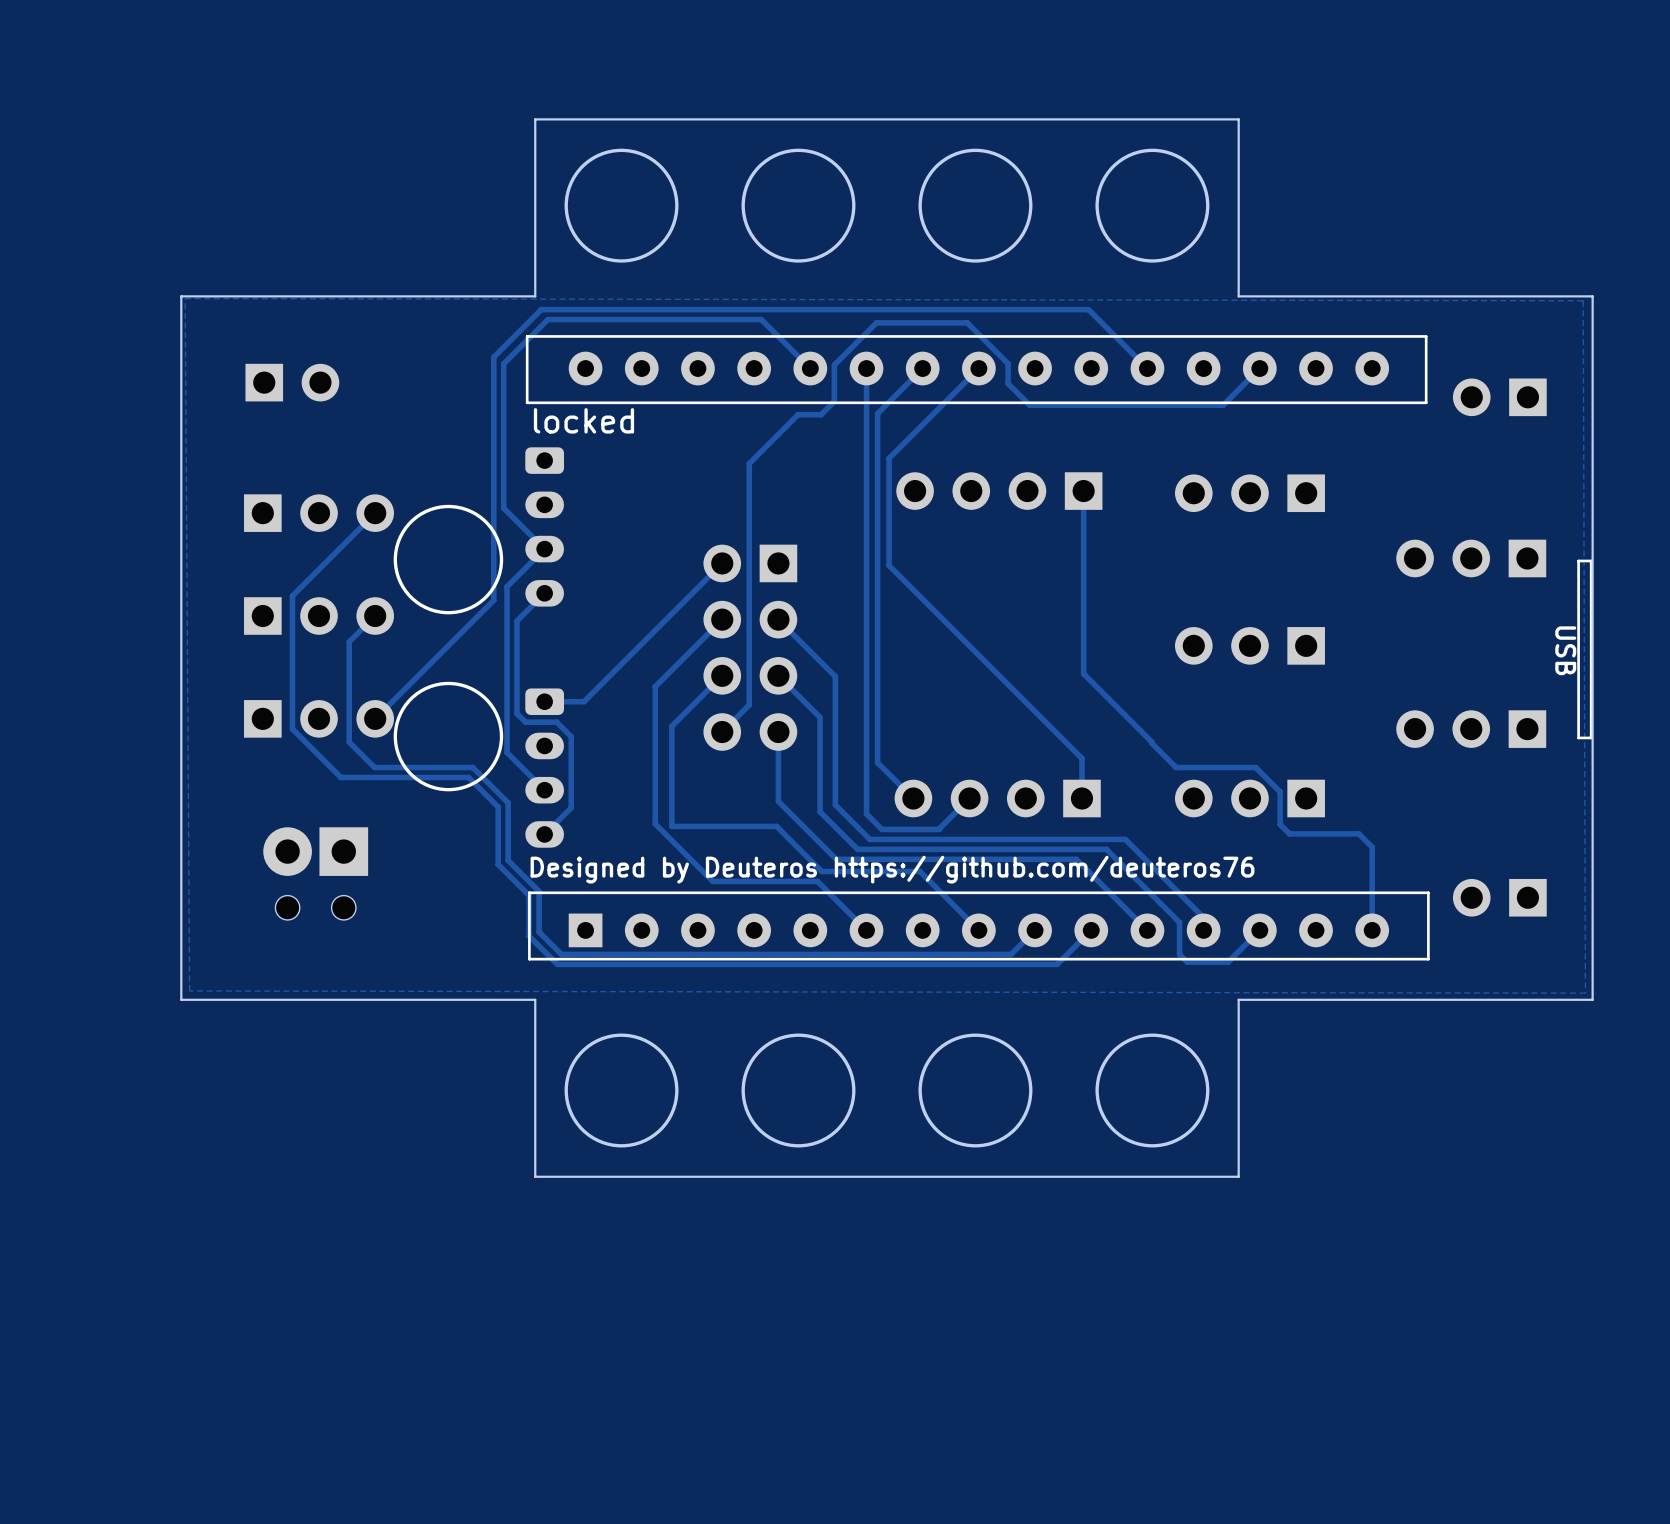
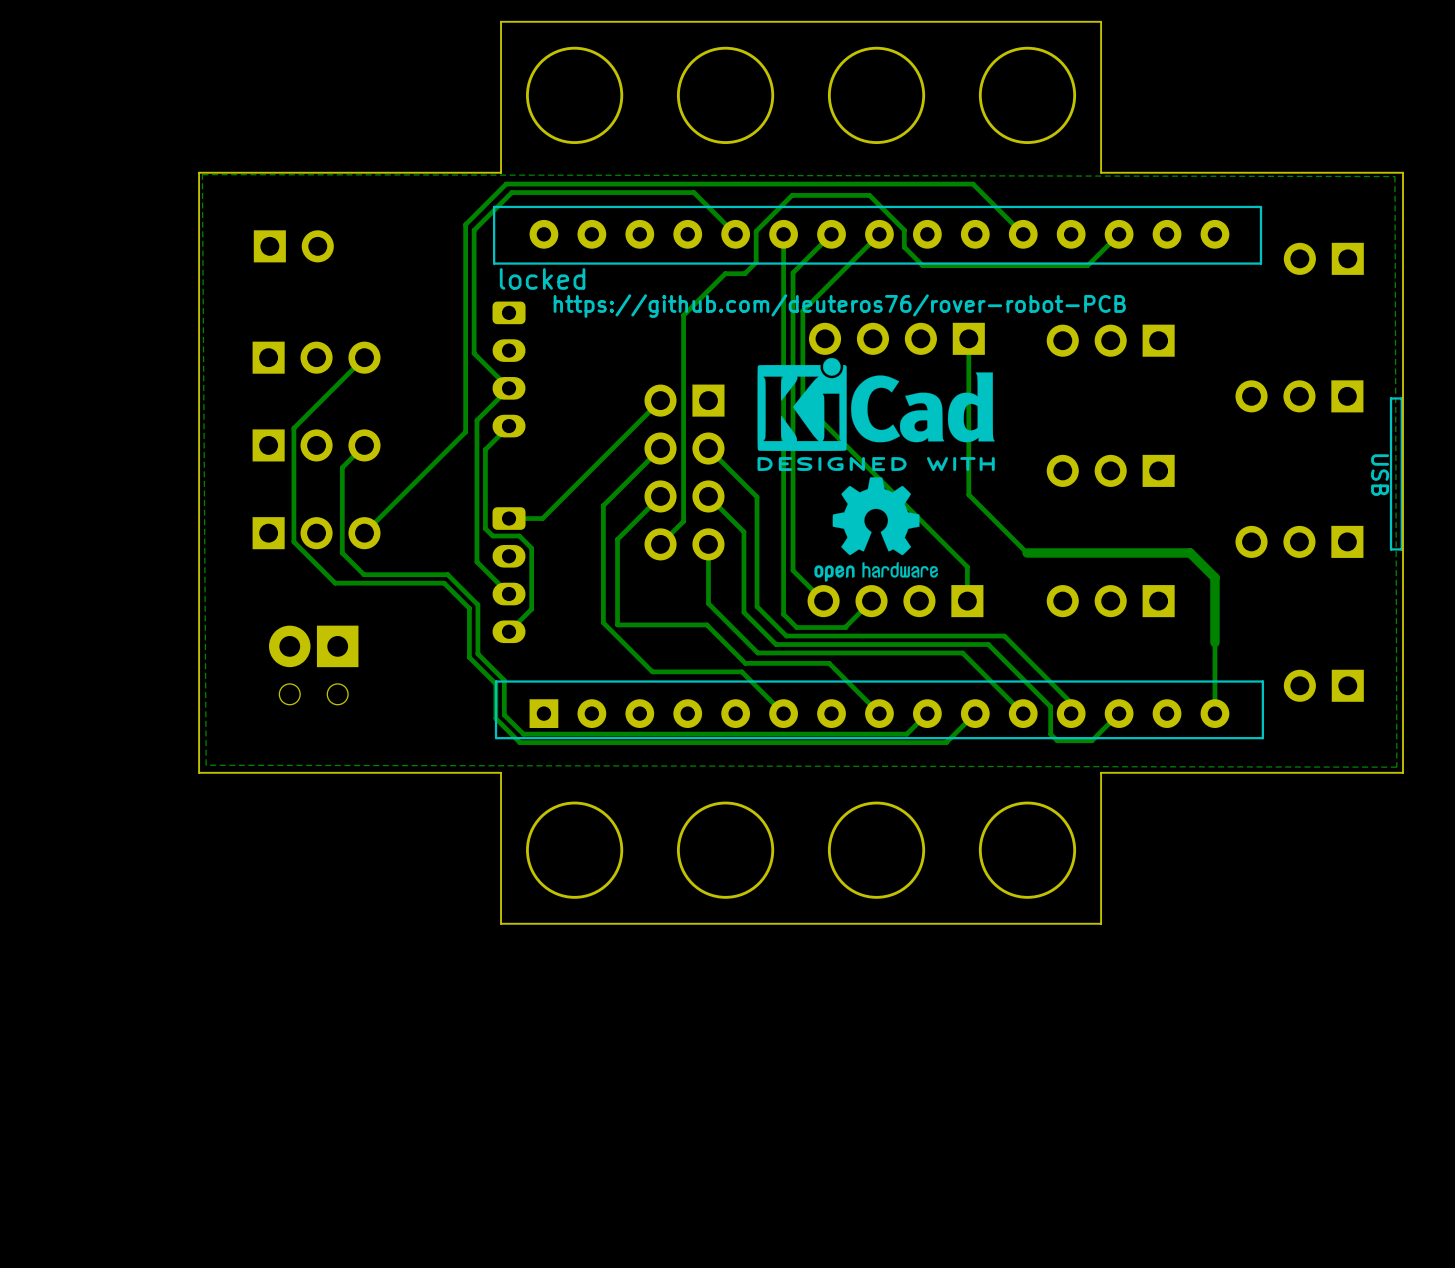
text: none -> https://github.com/deuteros76/rover-robot-PCB (839, 306)
drawing: [393, 504, 504, 615] -> none
drawing: none -> [757, 358, 995, 582]
drawing: [393, 681, 504, 792] -> none
track: (1151, 742) (1176, 767) (1255, 767) (1280, 791) (1280, 824) (1289, 833) (1358, 833) (1372, 847) -> (1027, 552) (1190, 552) (1214, 577) (1214, 642)
text: Designed by Deuteros https://github.com/deuteros76 (892, 869) -> none

